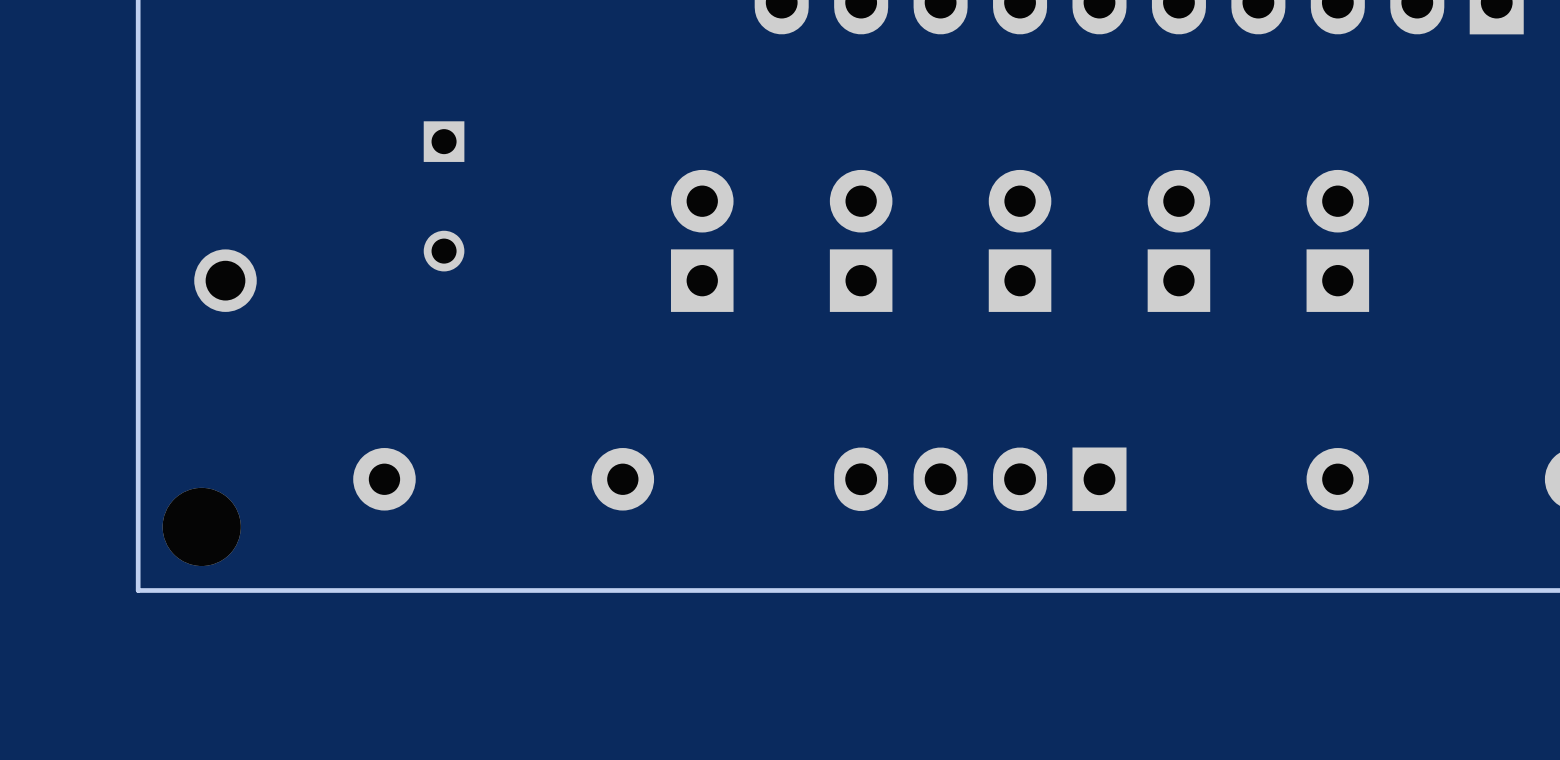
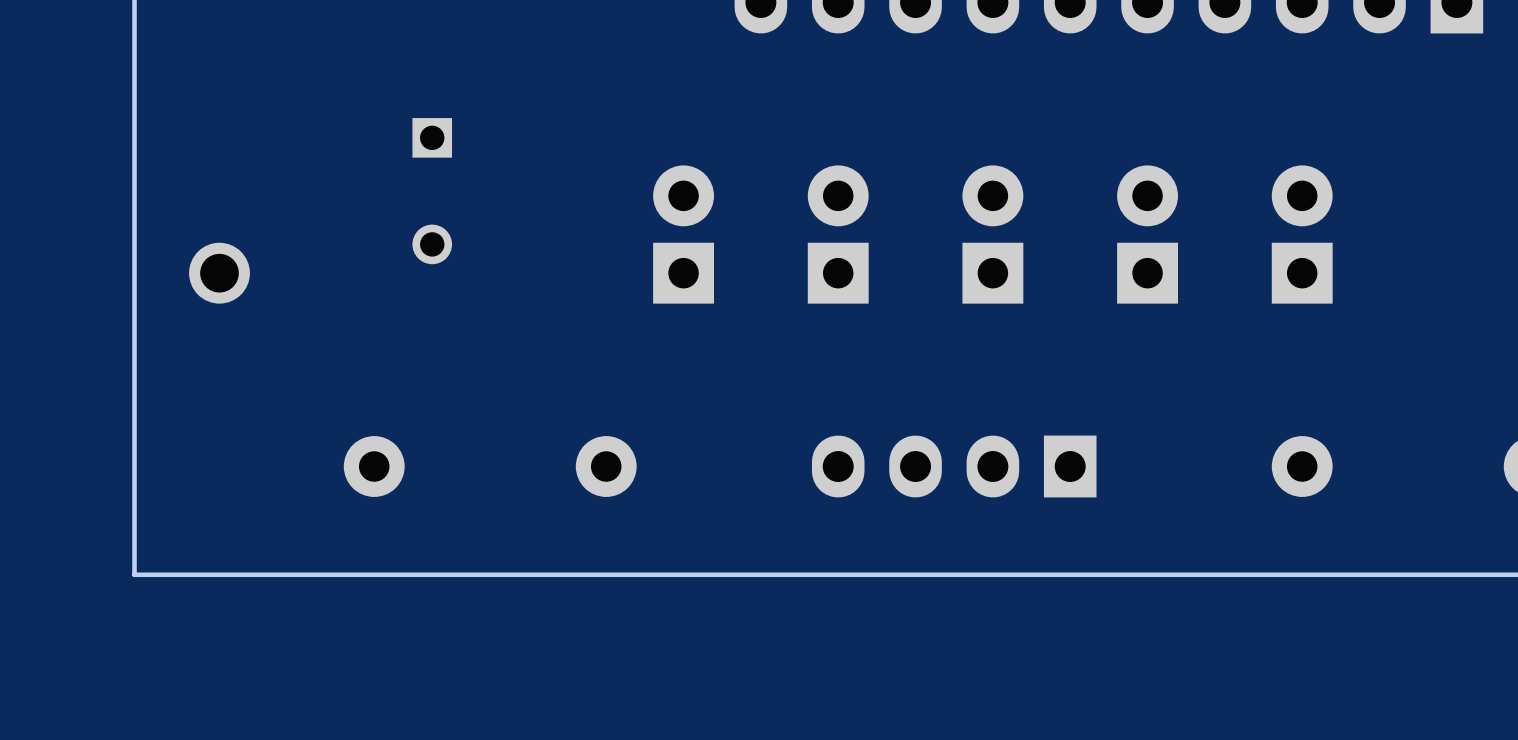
part: (201, 526) -> none

